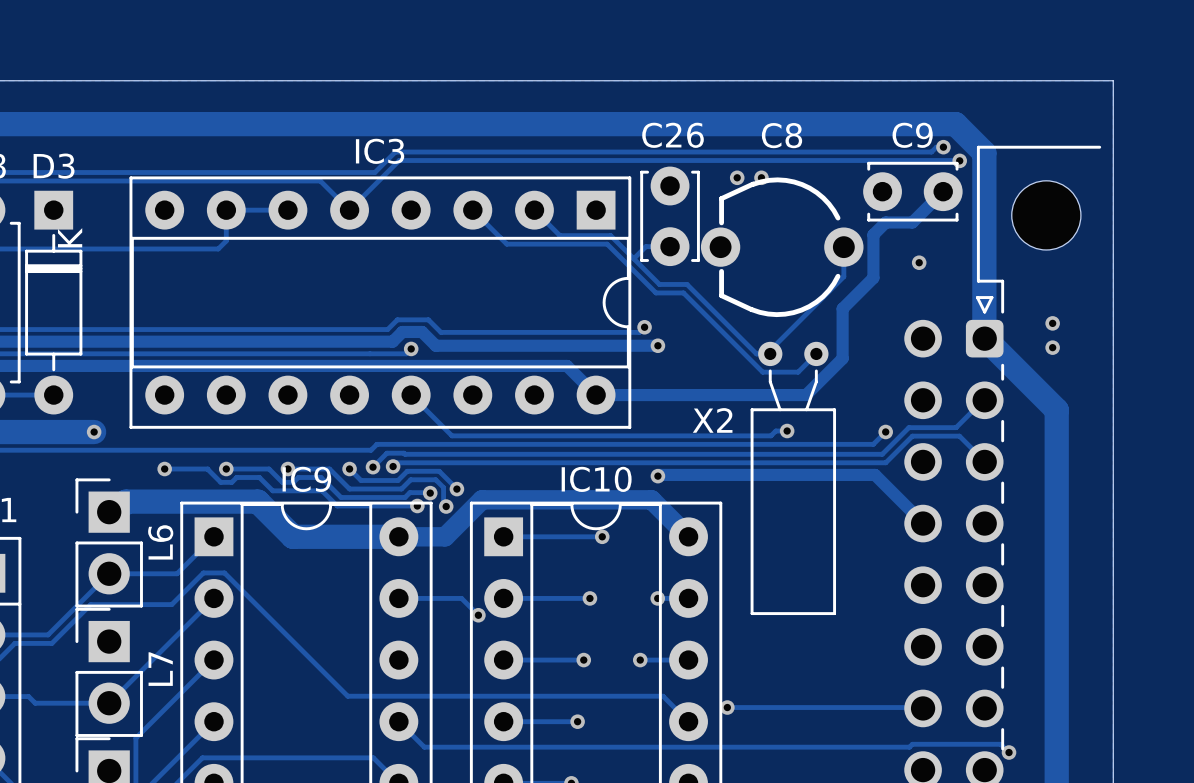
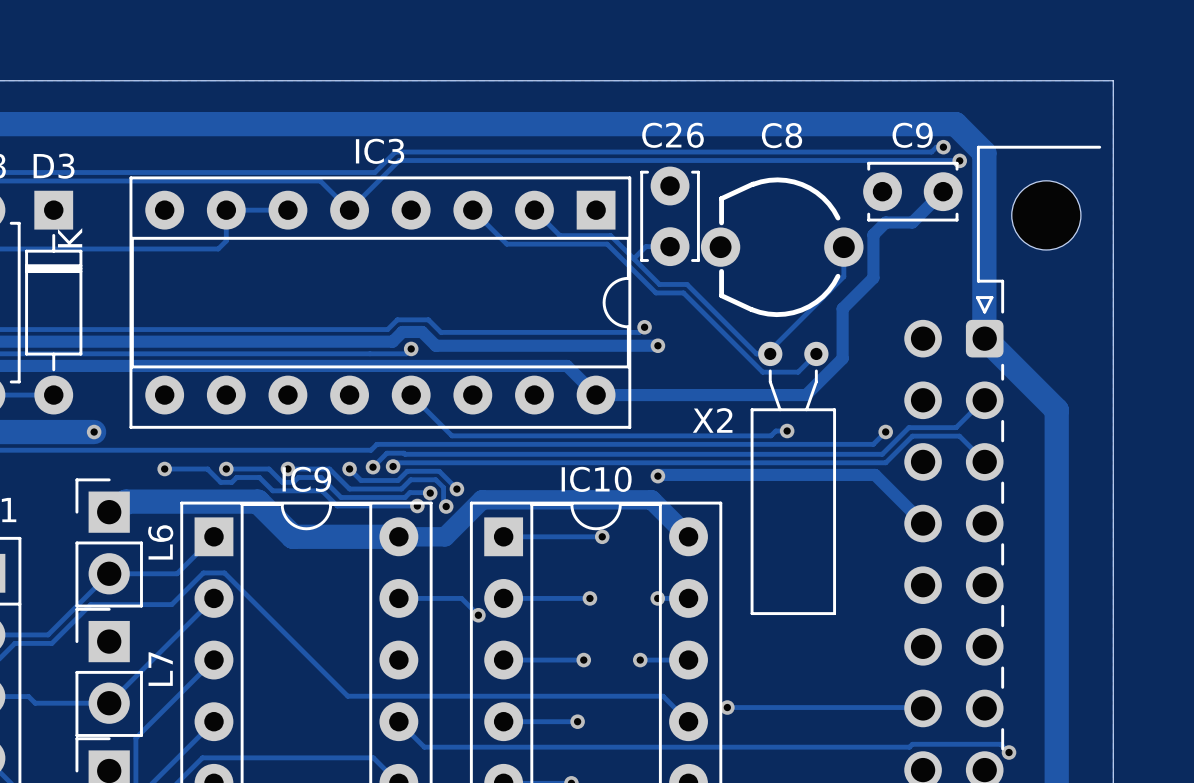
via: (737, 177) -> none
via: (761, 177) -> none
via: (919, 262) -> none
via: (1052, 323) -> none
via: (1052, 347) -> none

